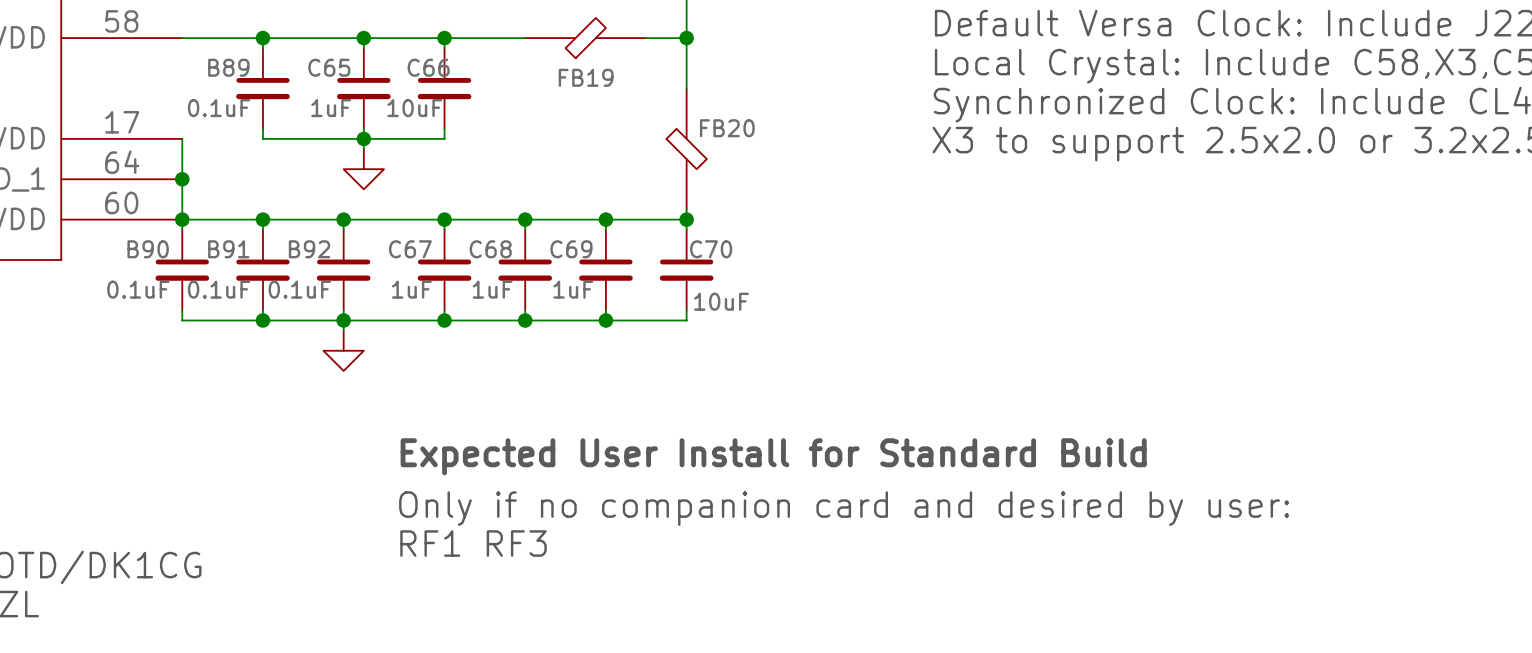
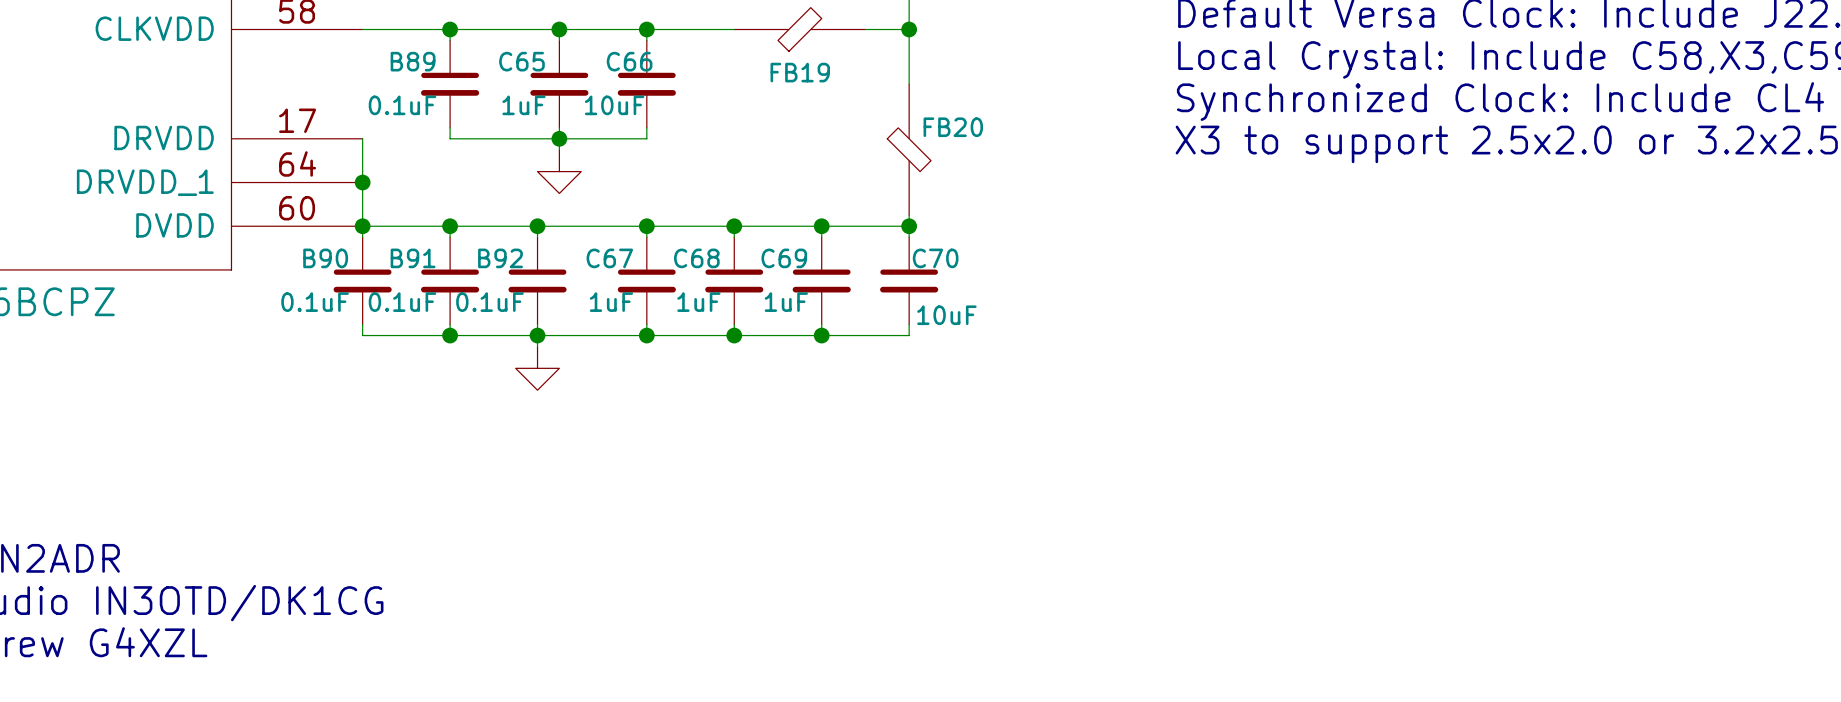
text: Expected User Install for Standard Build (773, 456) -> none
text: Only if no companion card and desired by user: (844, 508) -> none
text: RF1 RF3 (473, 543) -> none

